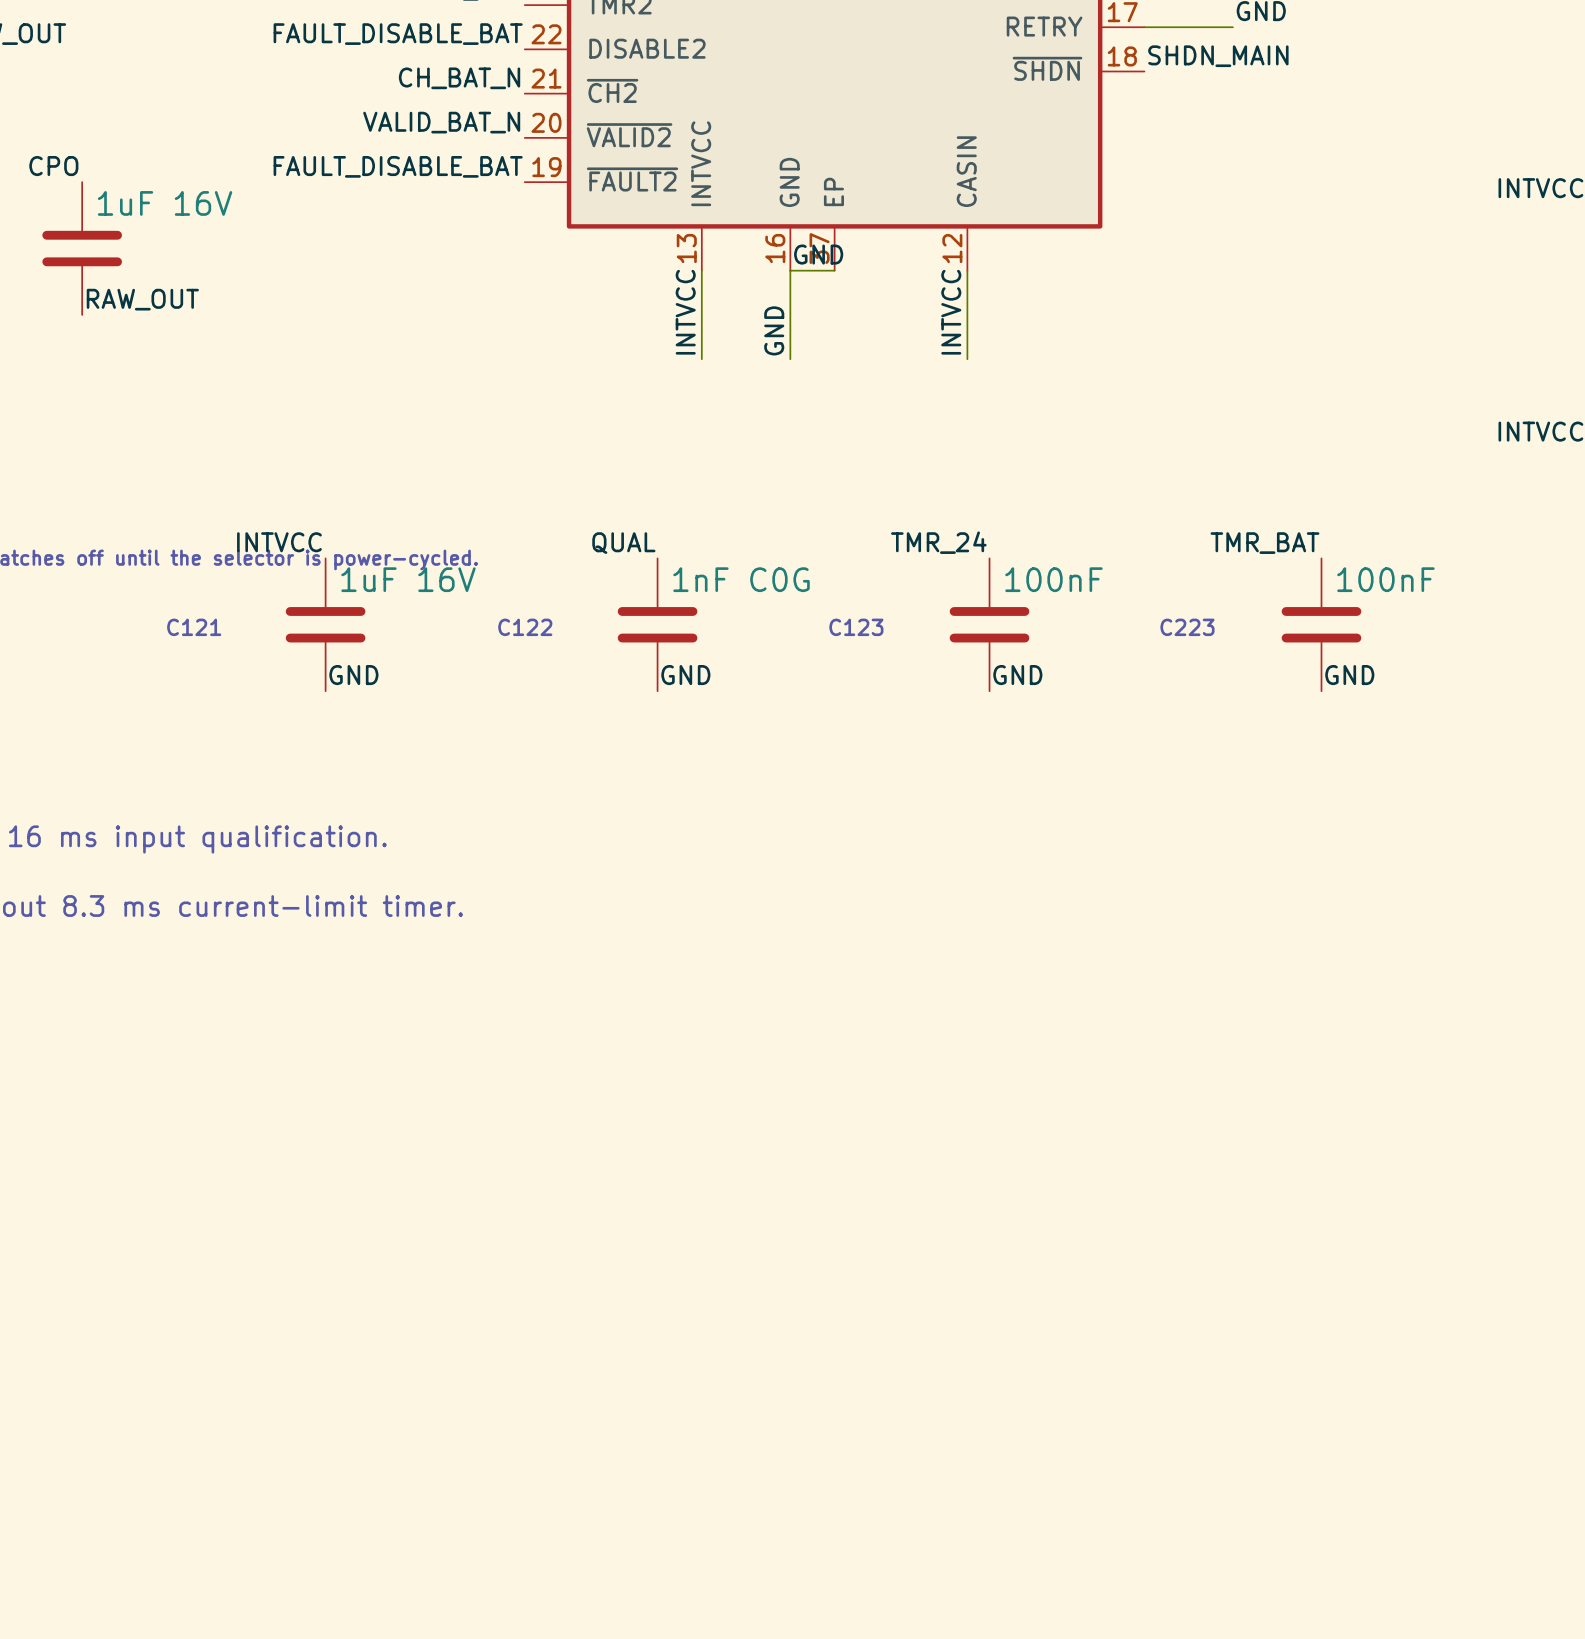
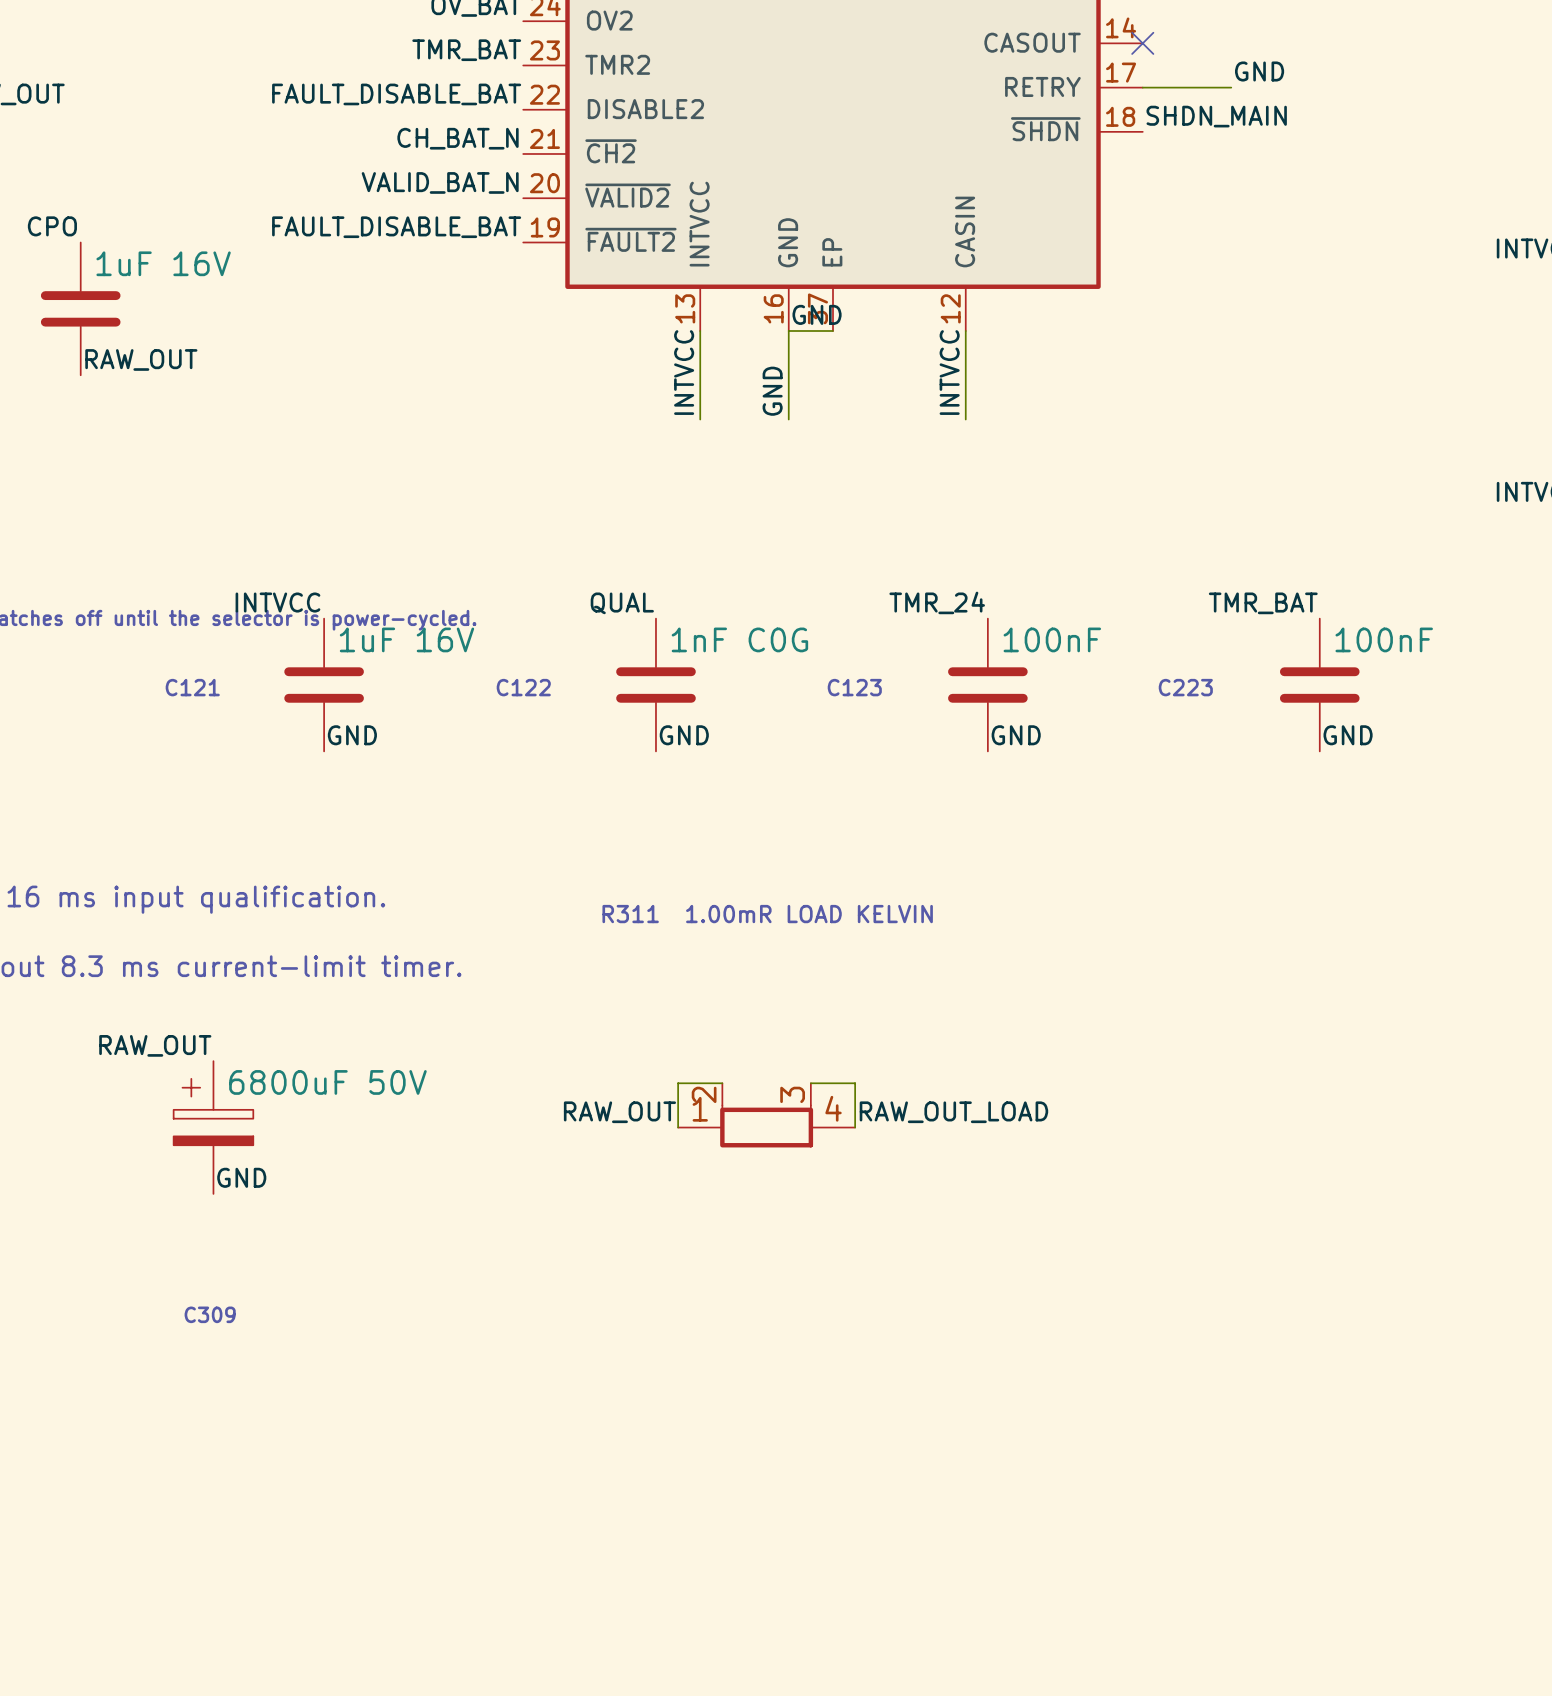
text: none -> R311 1.00mR LOAD KELVIN (767, 914)
label: none -> RAW_OUT (155, 1045)
wire: none -> (722, 1083) (678, 1083) (678, 1127)
wire: none -> (810, 1083) (855, 1083) (855, 1127)
label: none -> RAW_OUT (619, 1112)
label: none -> RAW_OUT_LOAD (953, 1112)
part: none -> (766, 1115)
part: none -> 6800uF 50V (213, 1127)
label: none -> GND (241, 1177)
text: none -> C309 (210, 1314)

